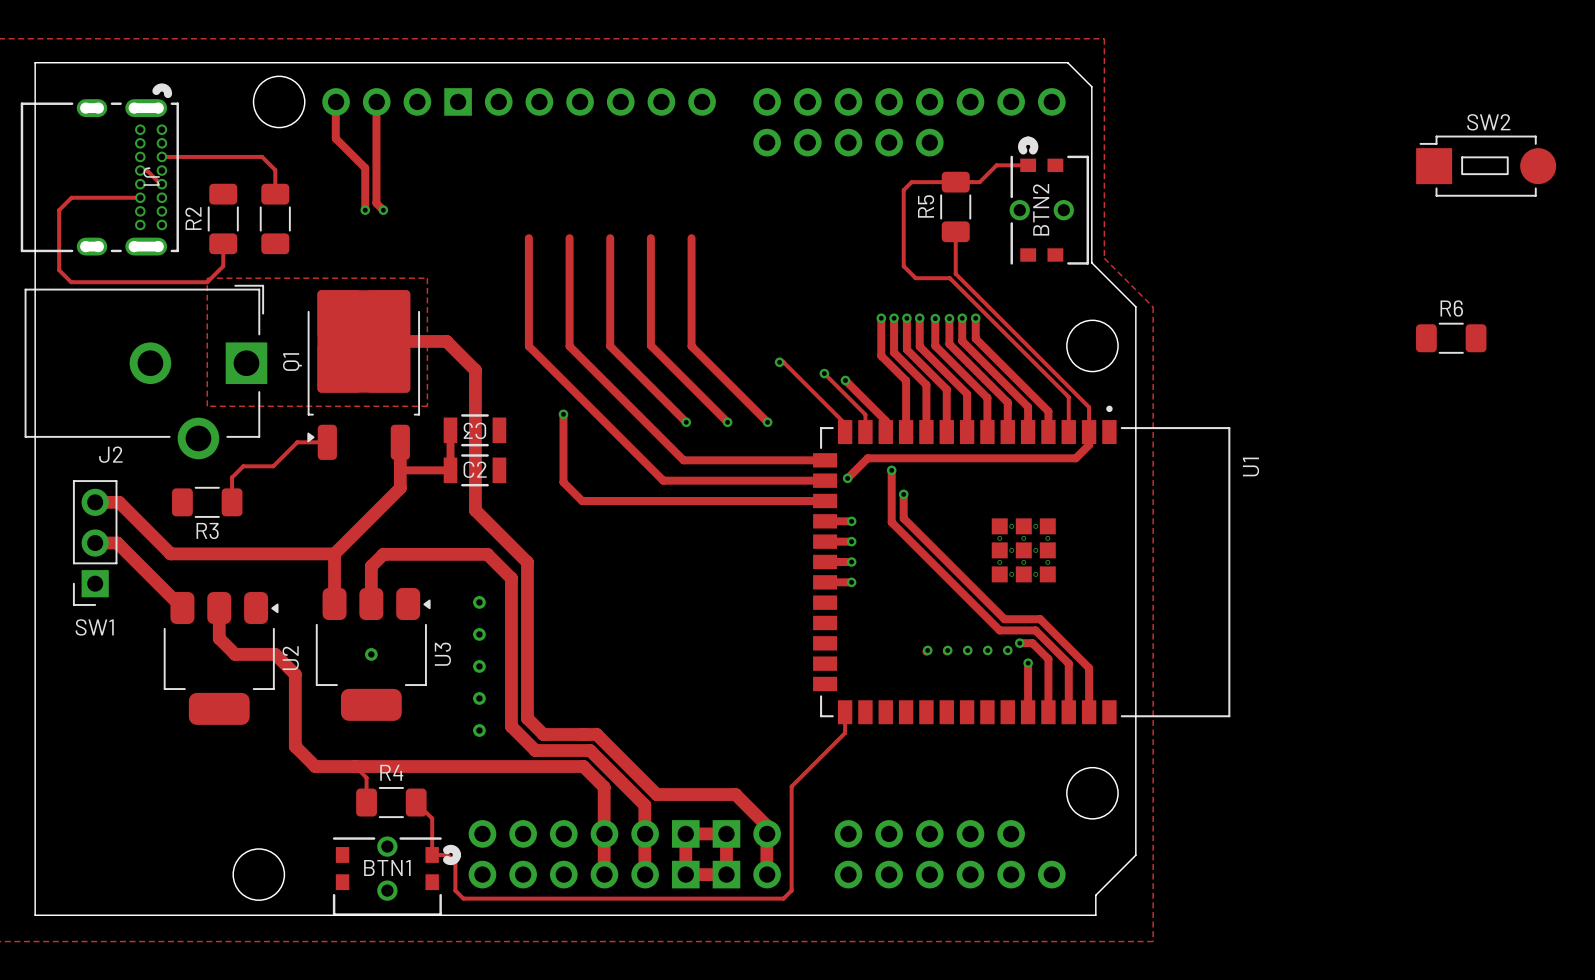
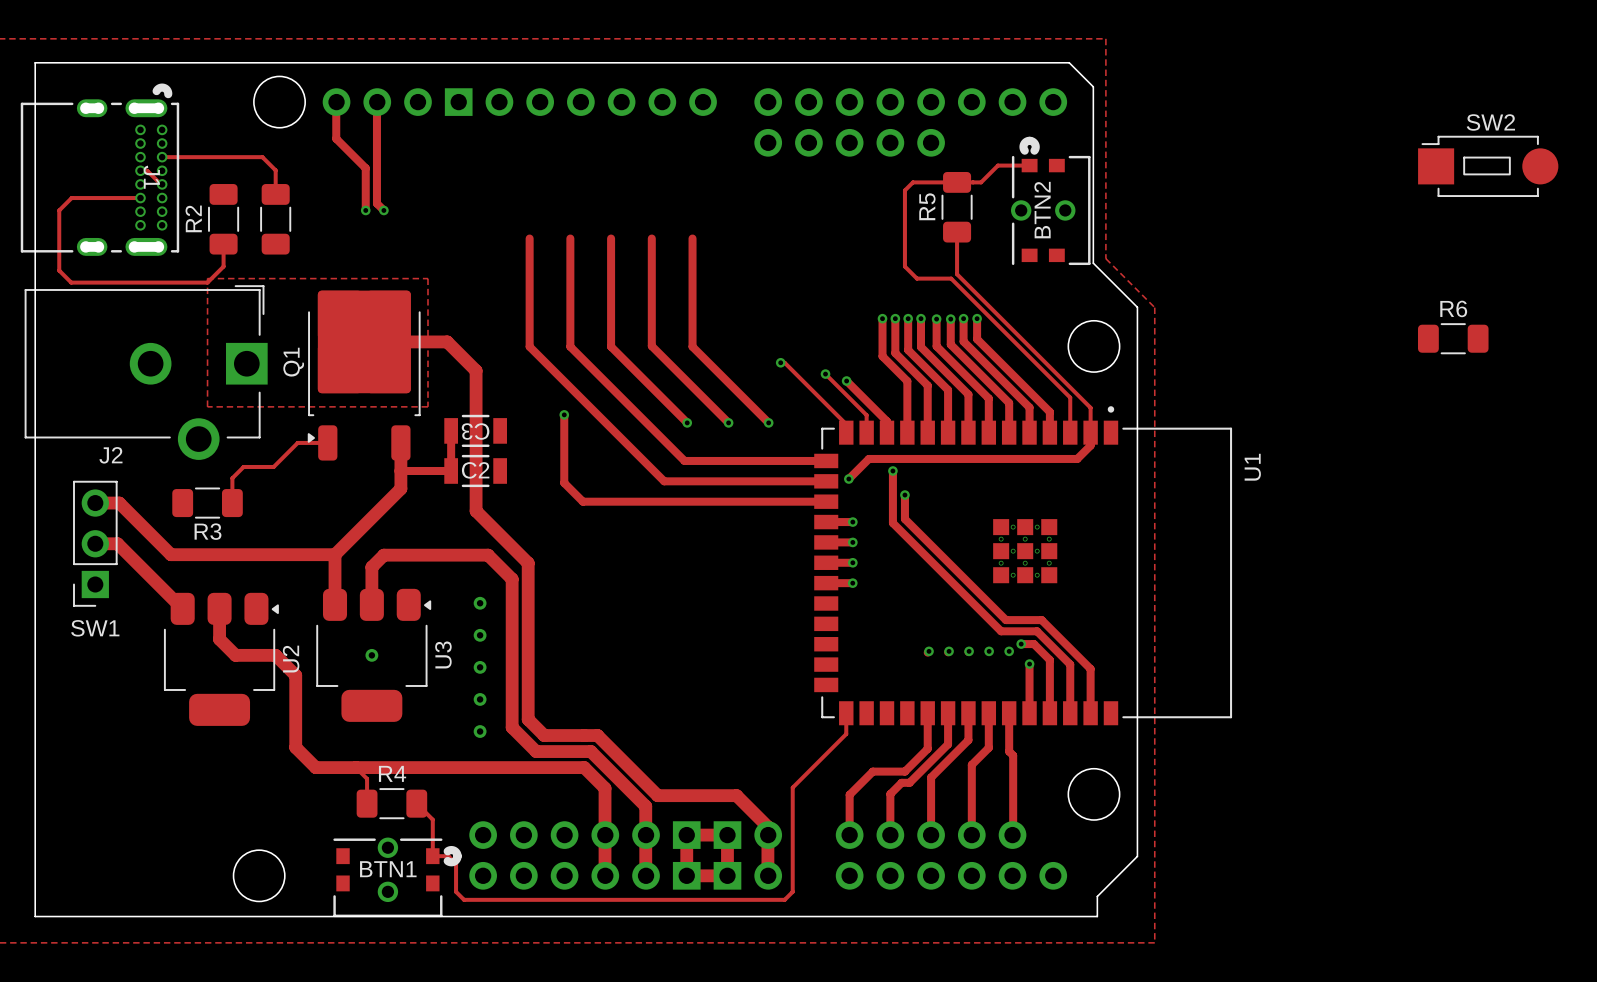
track: none -> (927, 713) (927, 748) (904, 771) (872, 771) (849, 794) (849, 835)
track: none -> (948, 713) (948, 744) (909, 782) (901, 782) (890, 794) (890, 835)
track: none -> (968, 713) (968, 740) (931, 777) (931, 835)
track: none -> (988, 713) (988, 747) (971, 764) (971, 835)
track: none -> (1009, 713) (1009, 751) (1013, 755) (1012, 835)

